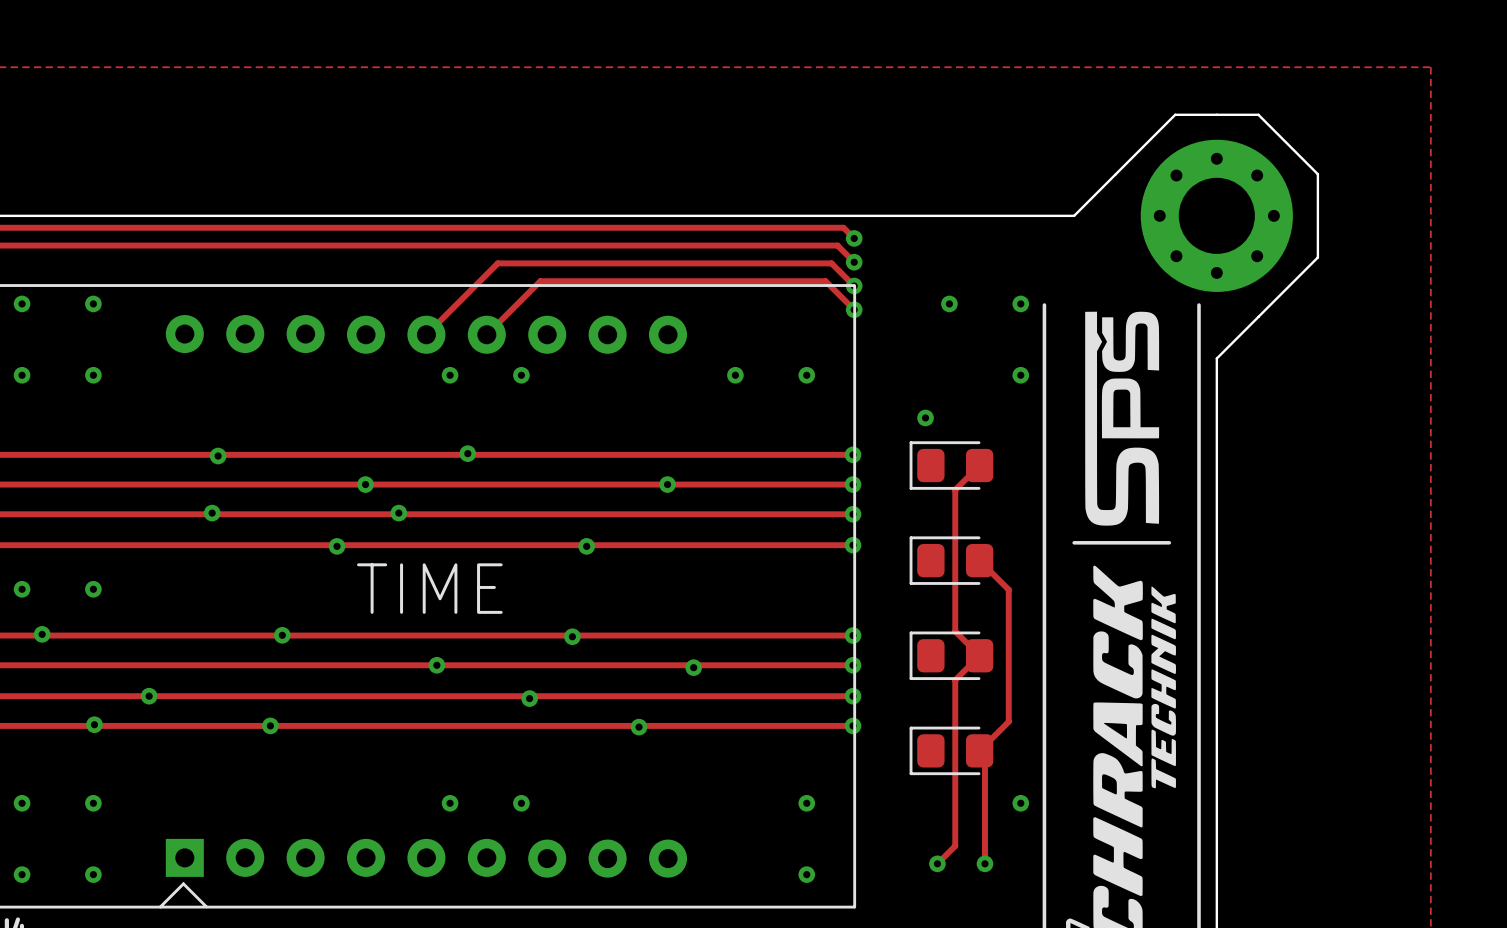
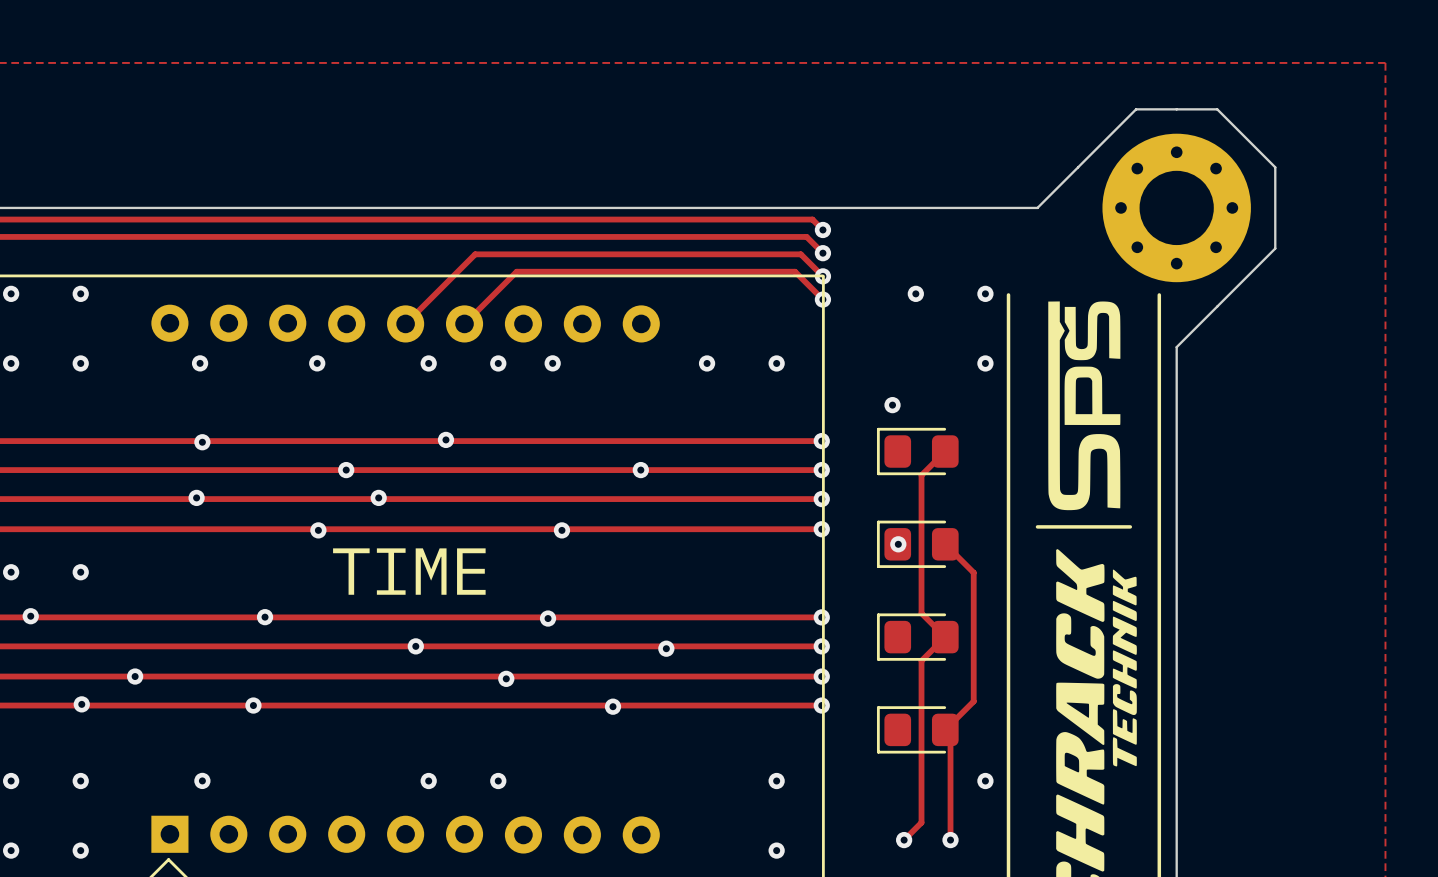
via: none -> (200, 363)
via: none -> (317, 363)
via: none -> (552, 363)
via: none -> (898, 544)
via: none -> (202, 780)

